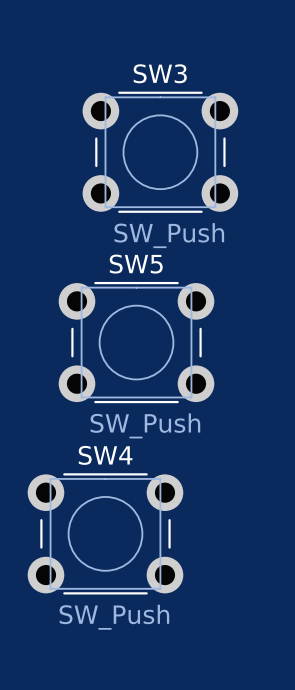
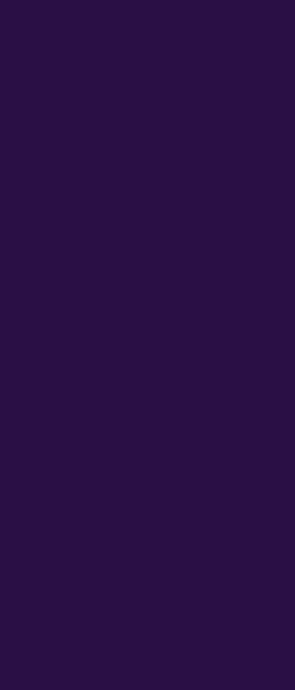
SW3: SW_Push (160, 152) -> none
SW5: SW_Push (136, 342) -> none
SW4: SW_Push (105, 533) -> none

